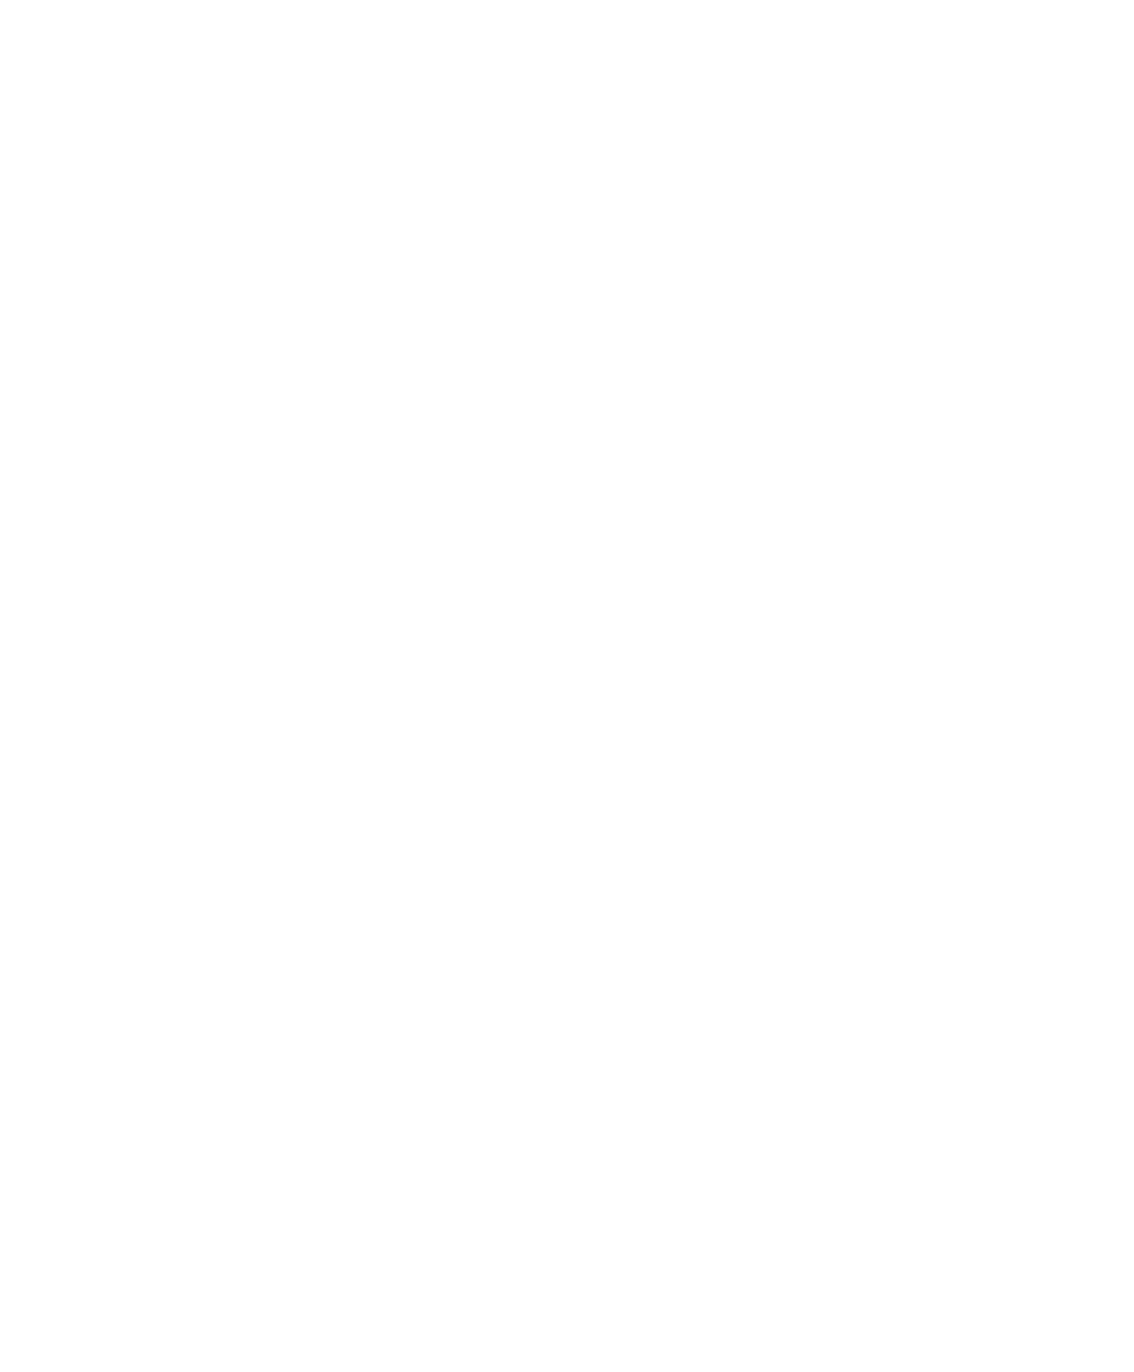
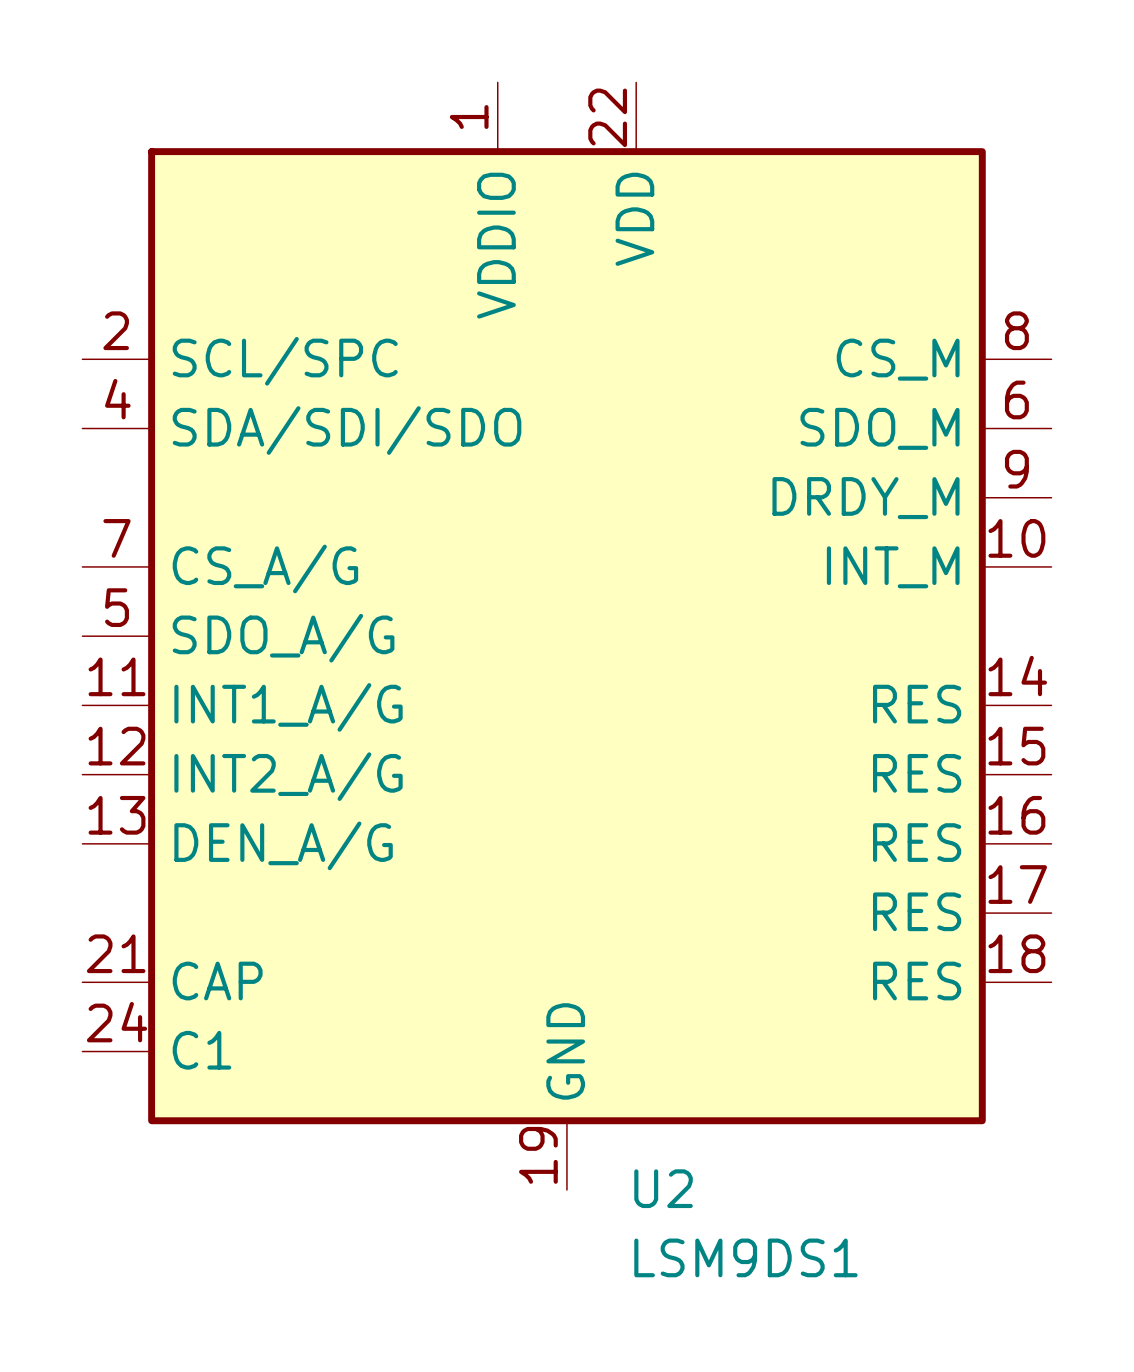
U2: none -> LSM9DS1 (566, 636)

